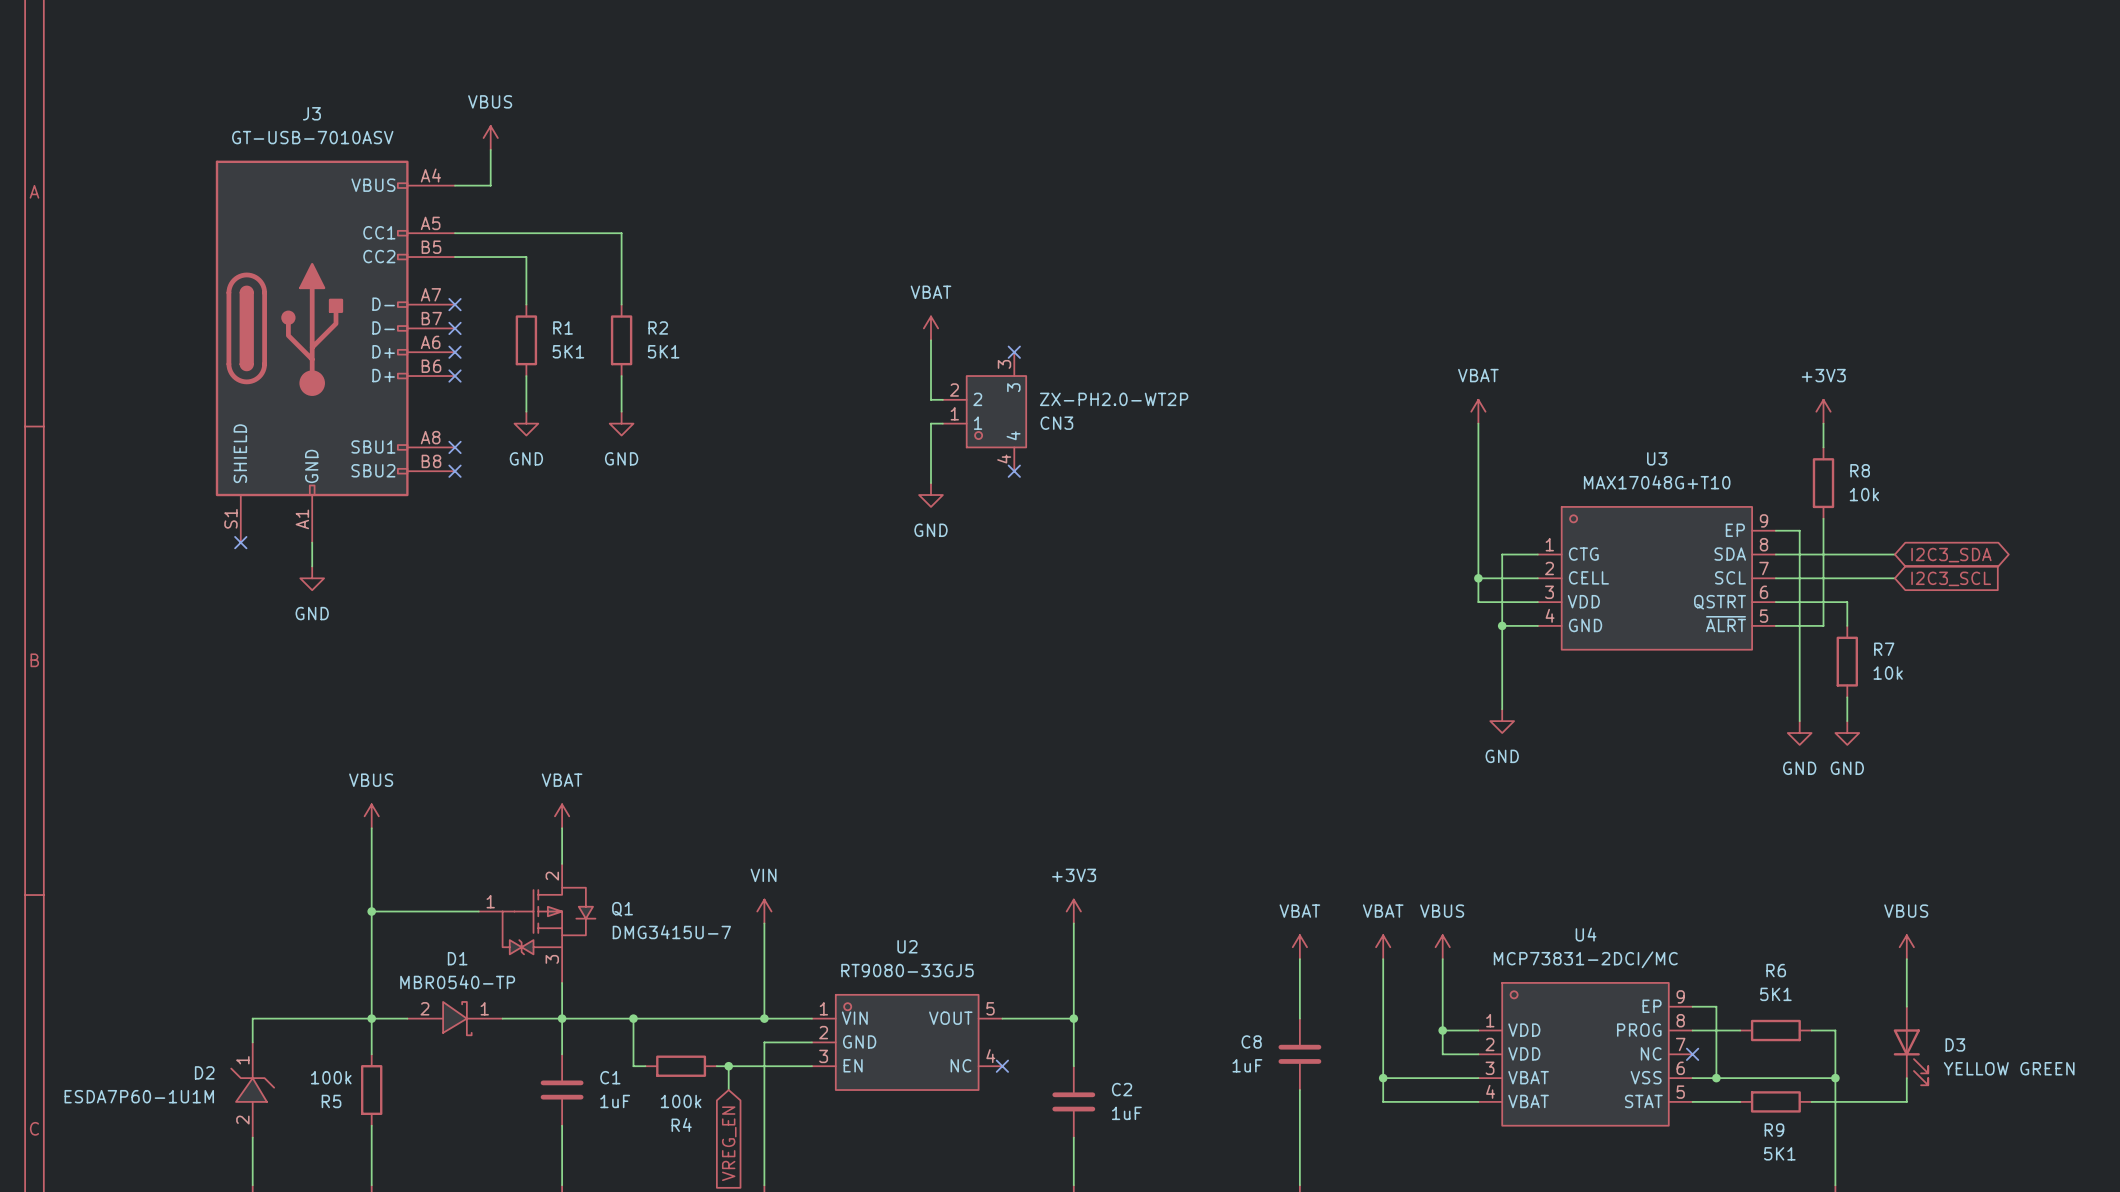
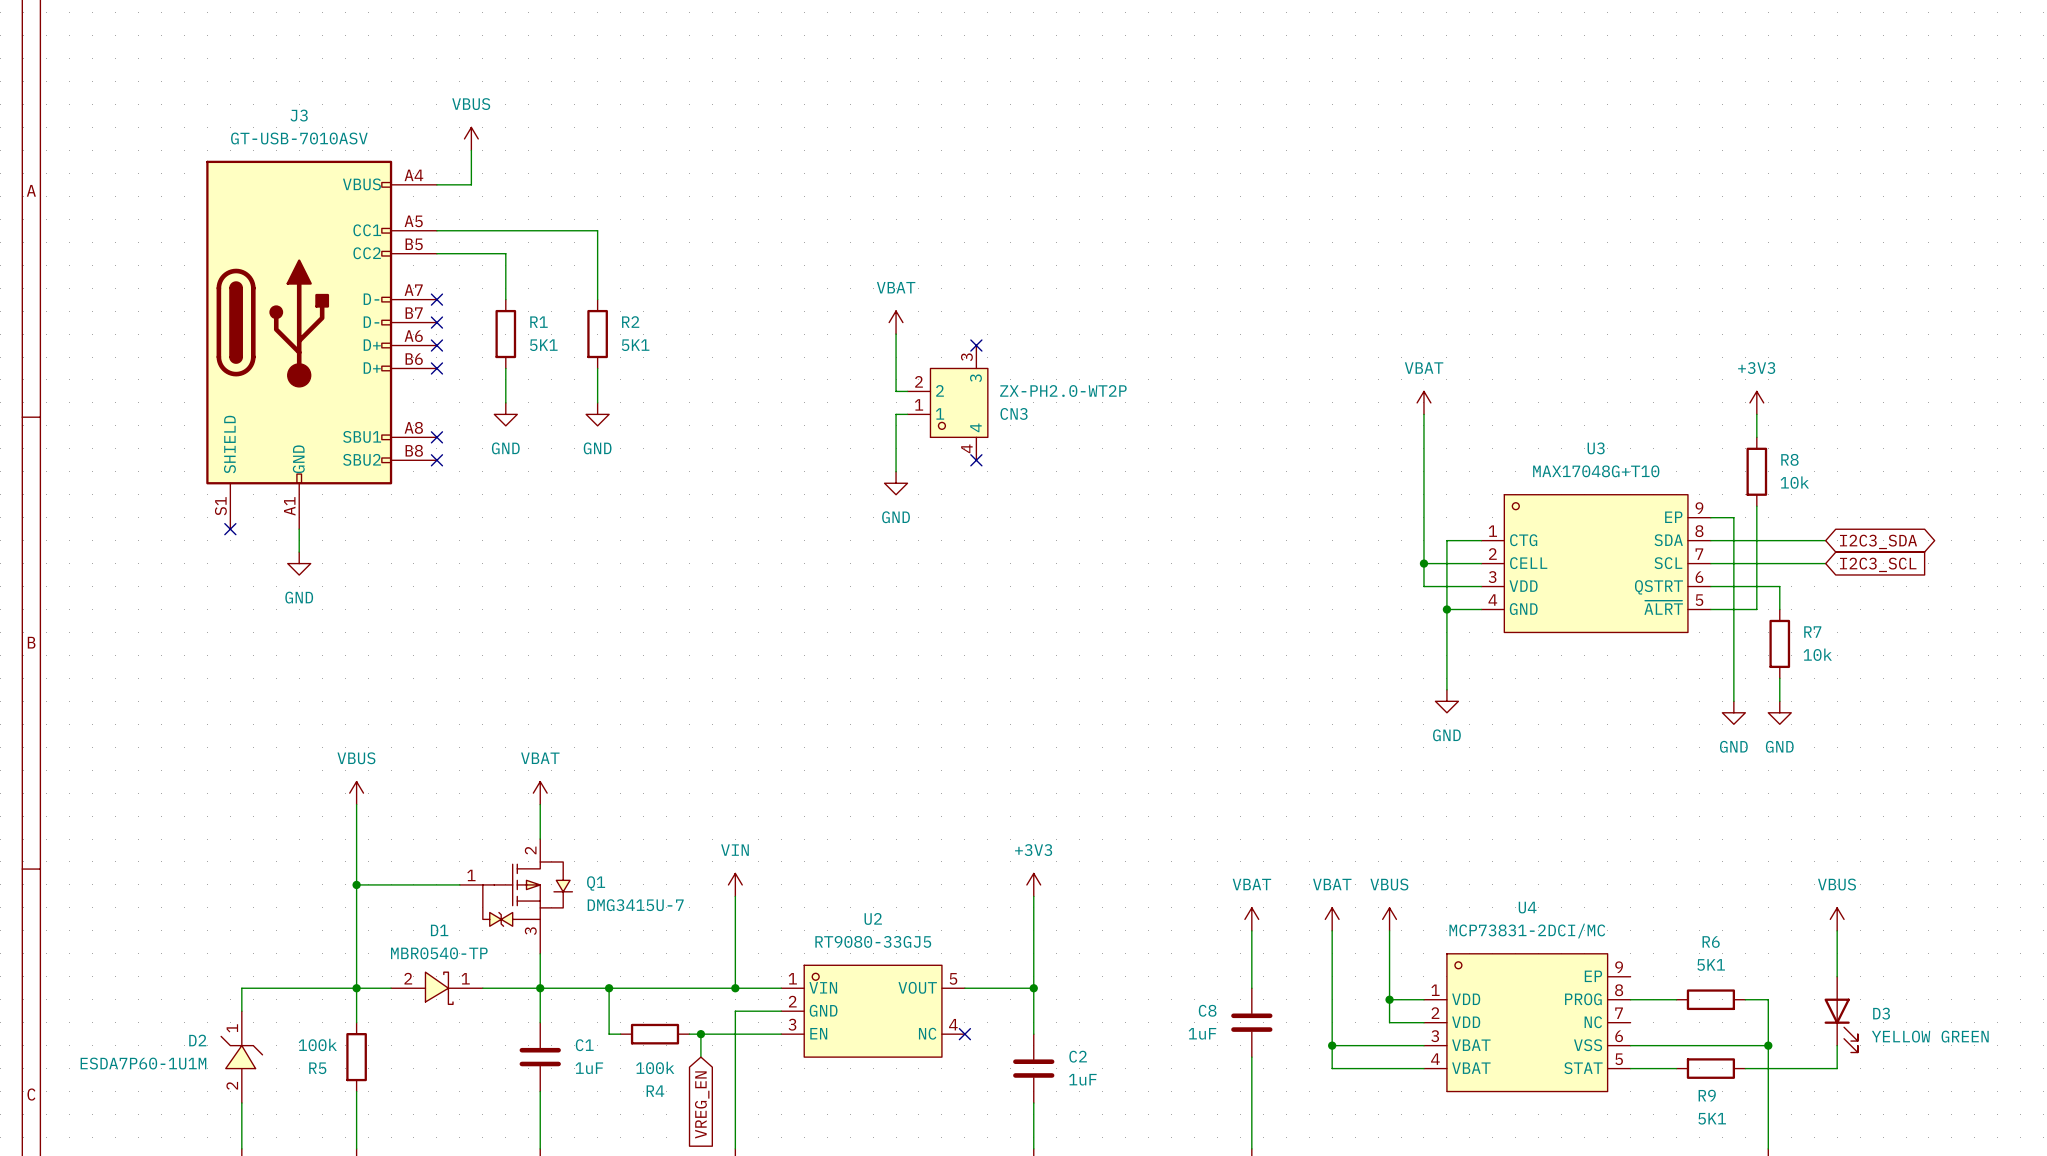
wire: (1692, 1006) (1716, 1006) (1716, 1078) -> none
no-connect mark: (1692, 1054) -> none
junction: (1716, 1078) -> none

